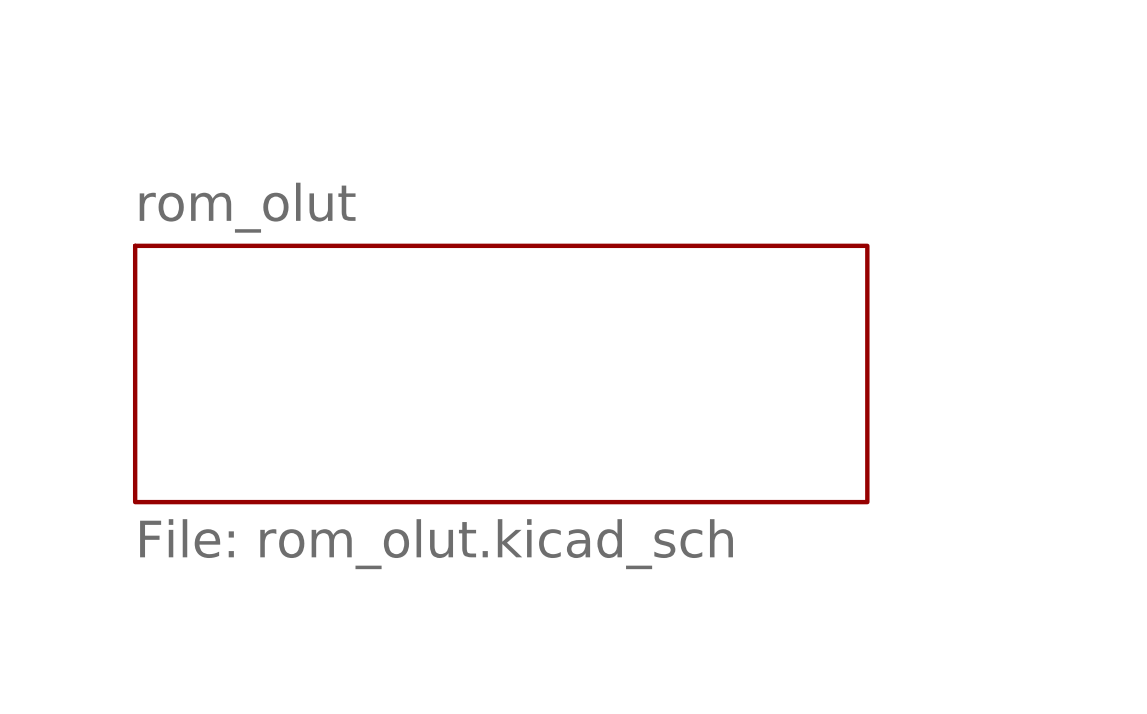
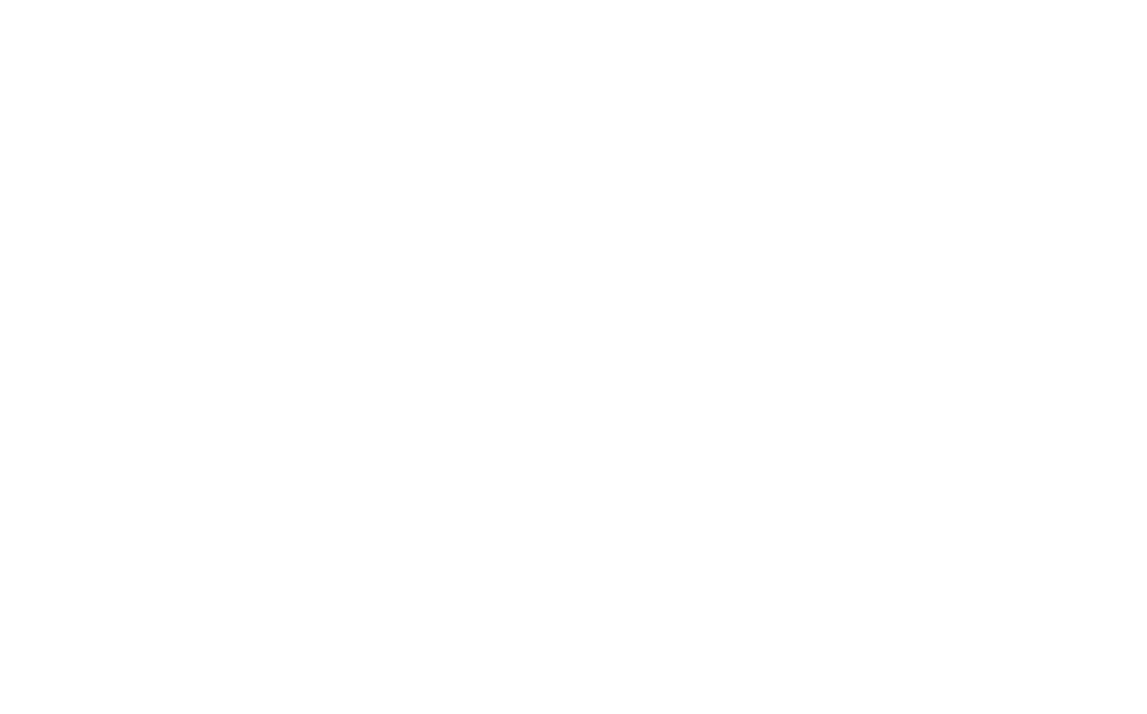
sheet rom_olut: File: rom_olut.kicad_sch (501, 373) -> none

